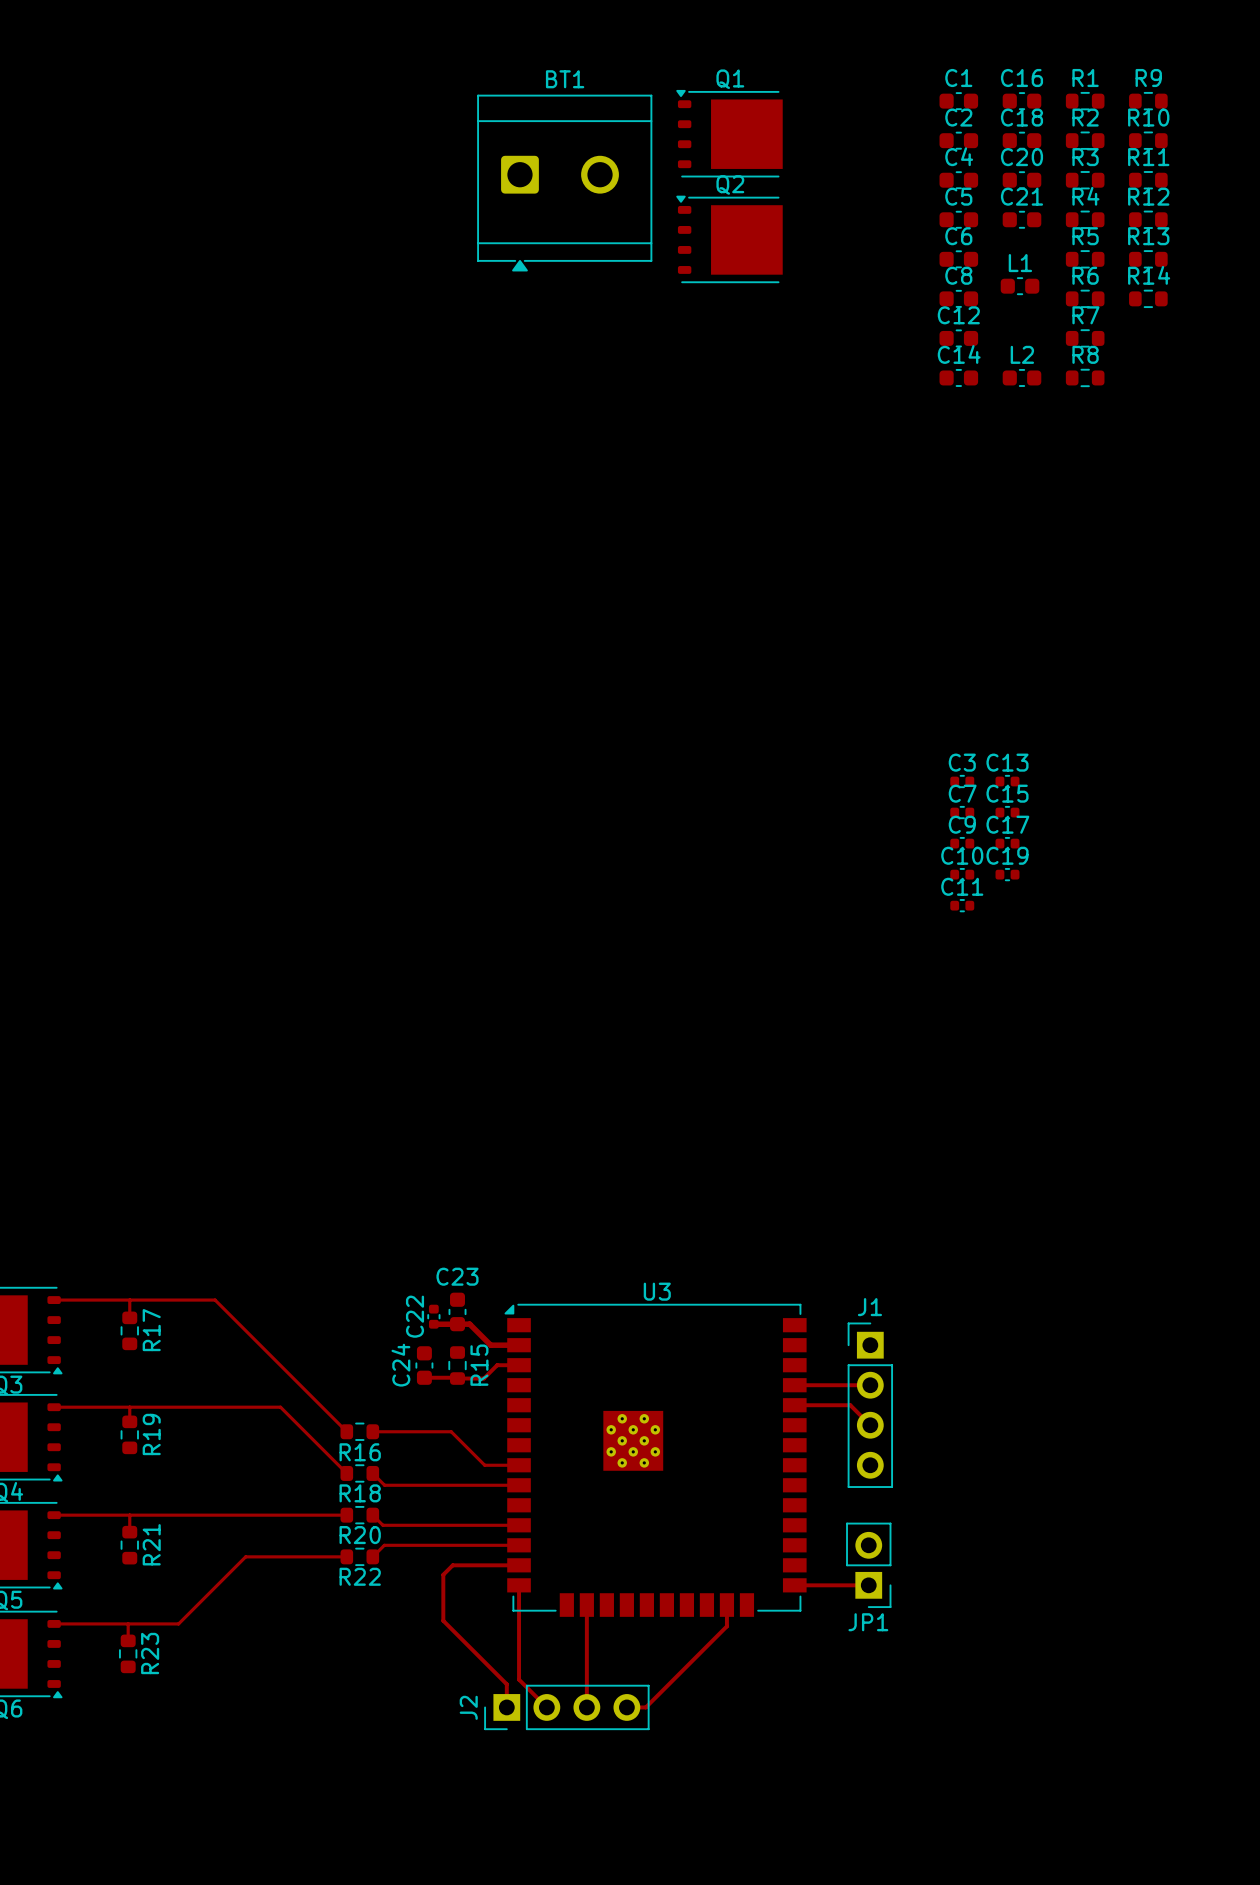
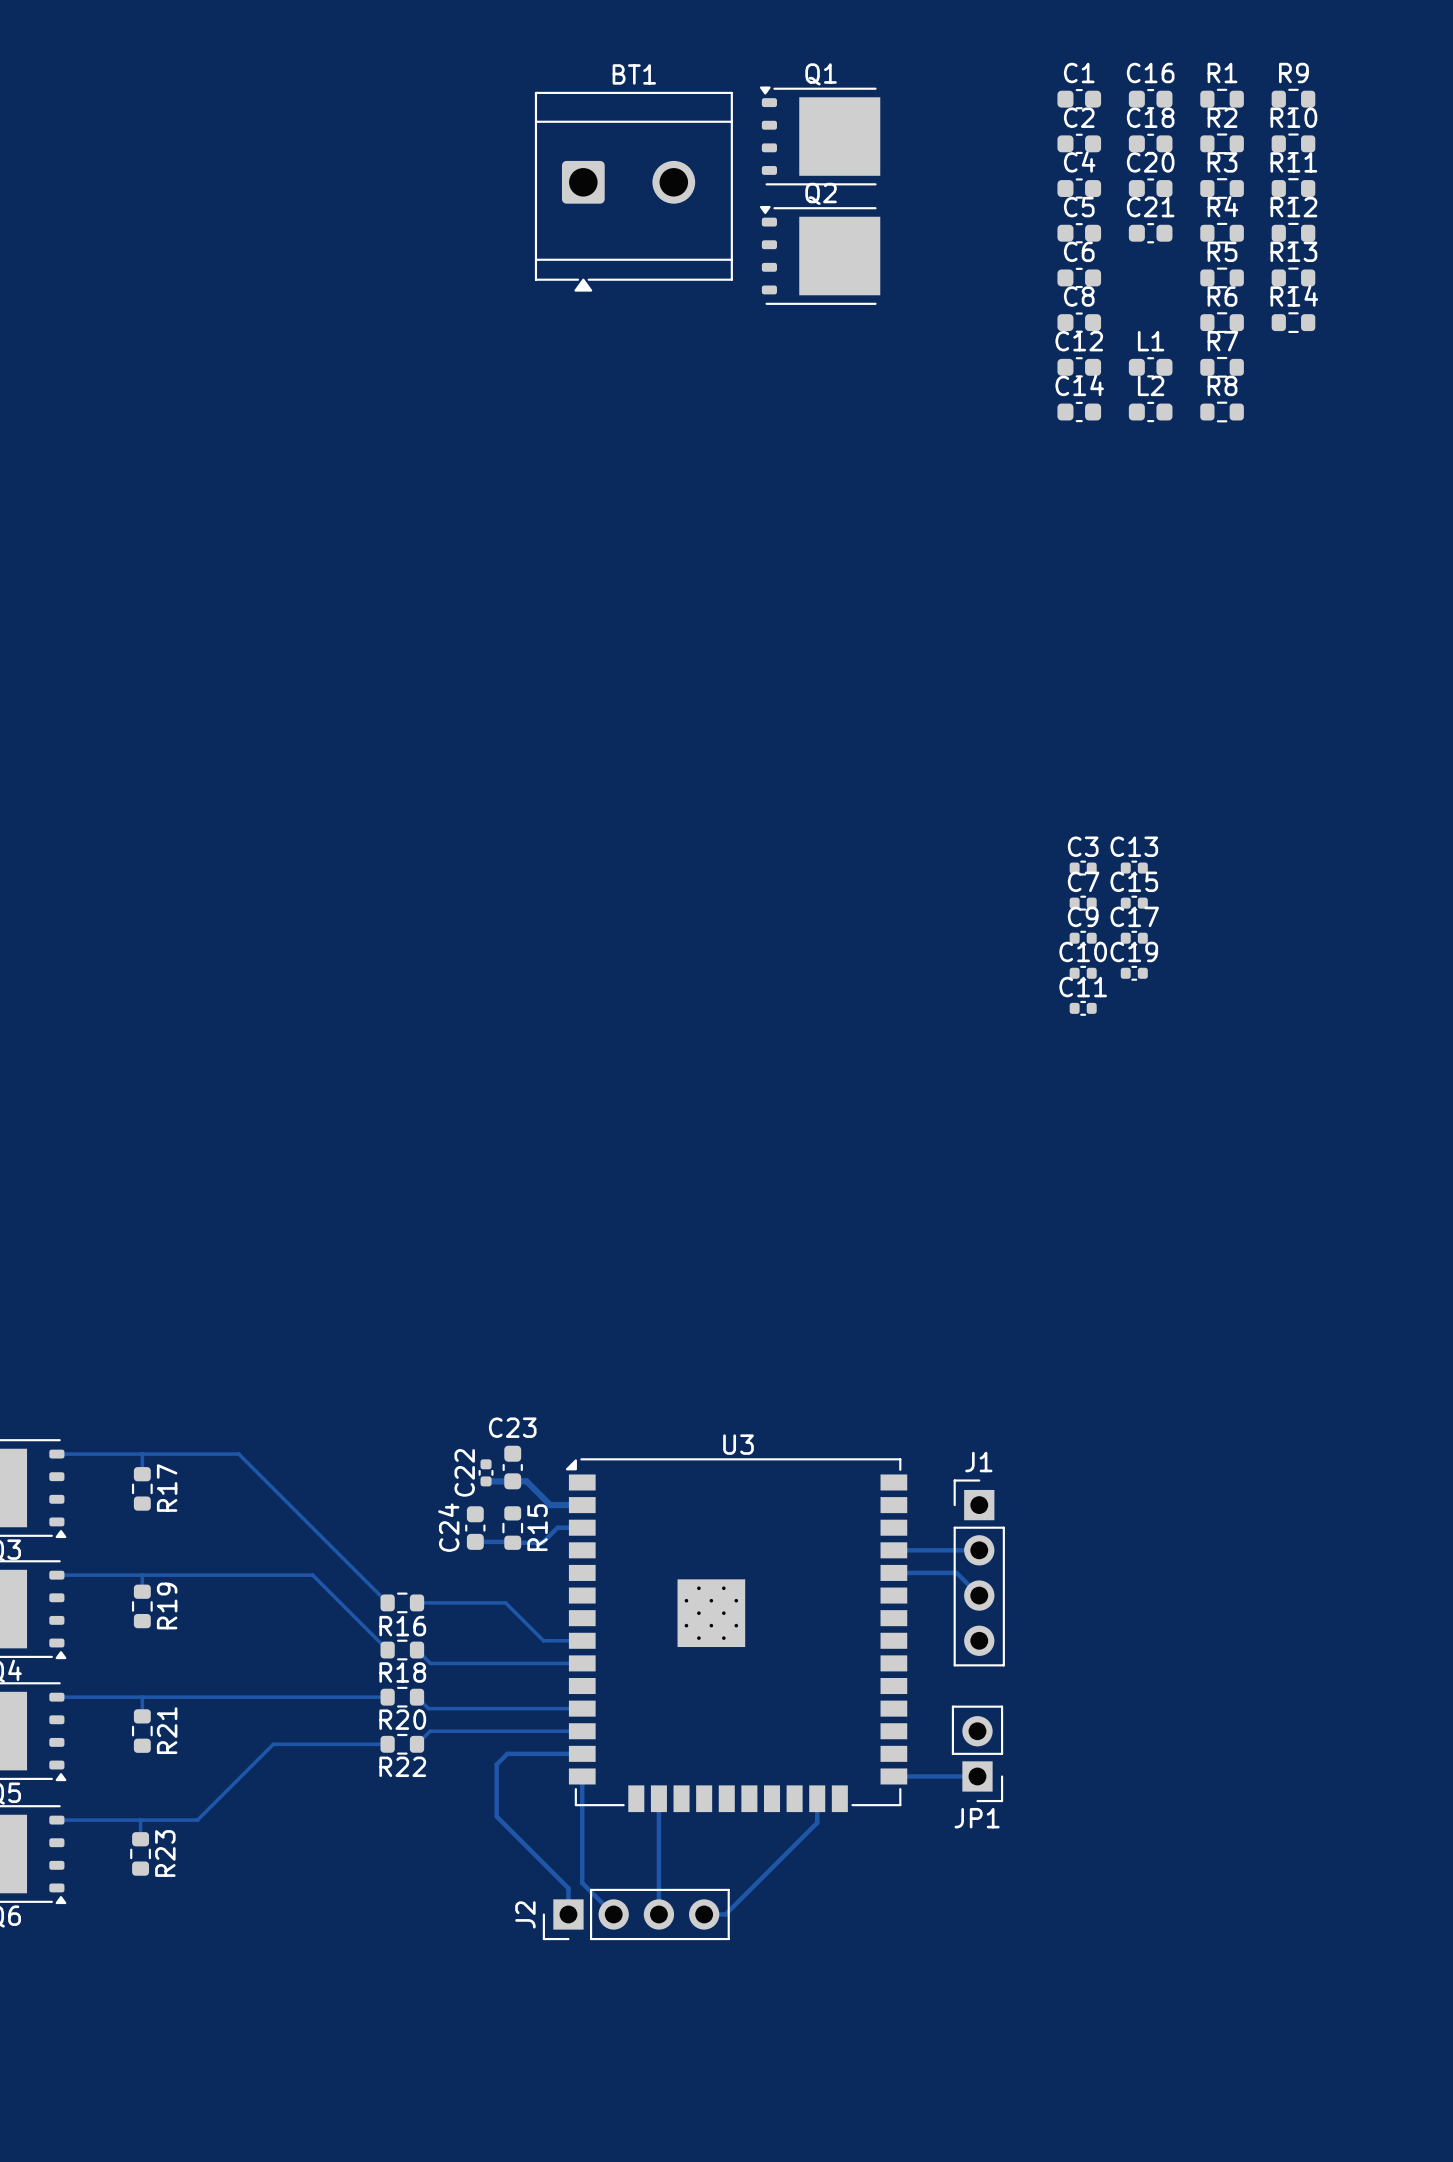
L1 position: (1020, 286) -> (1150, 367)

